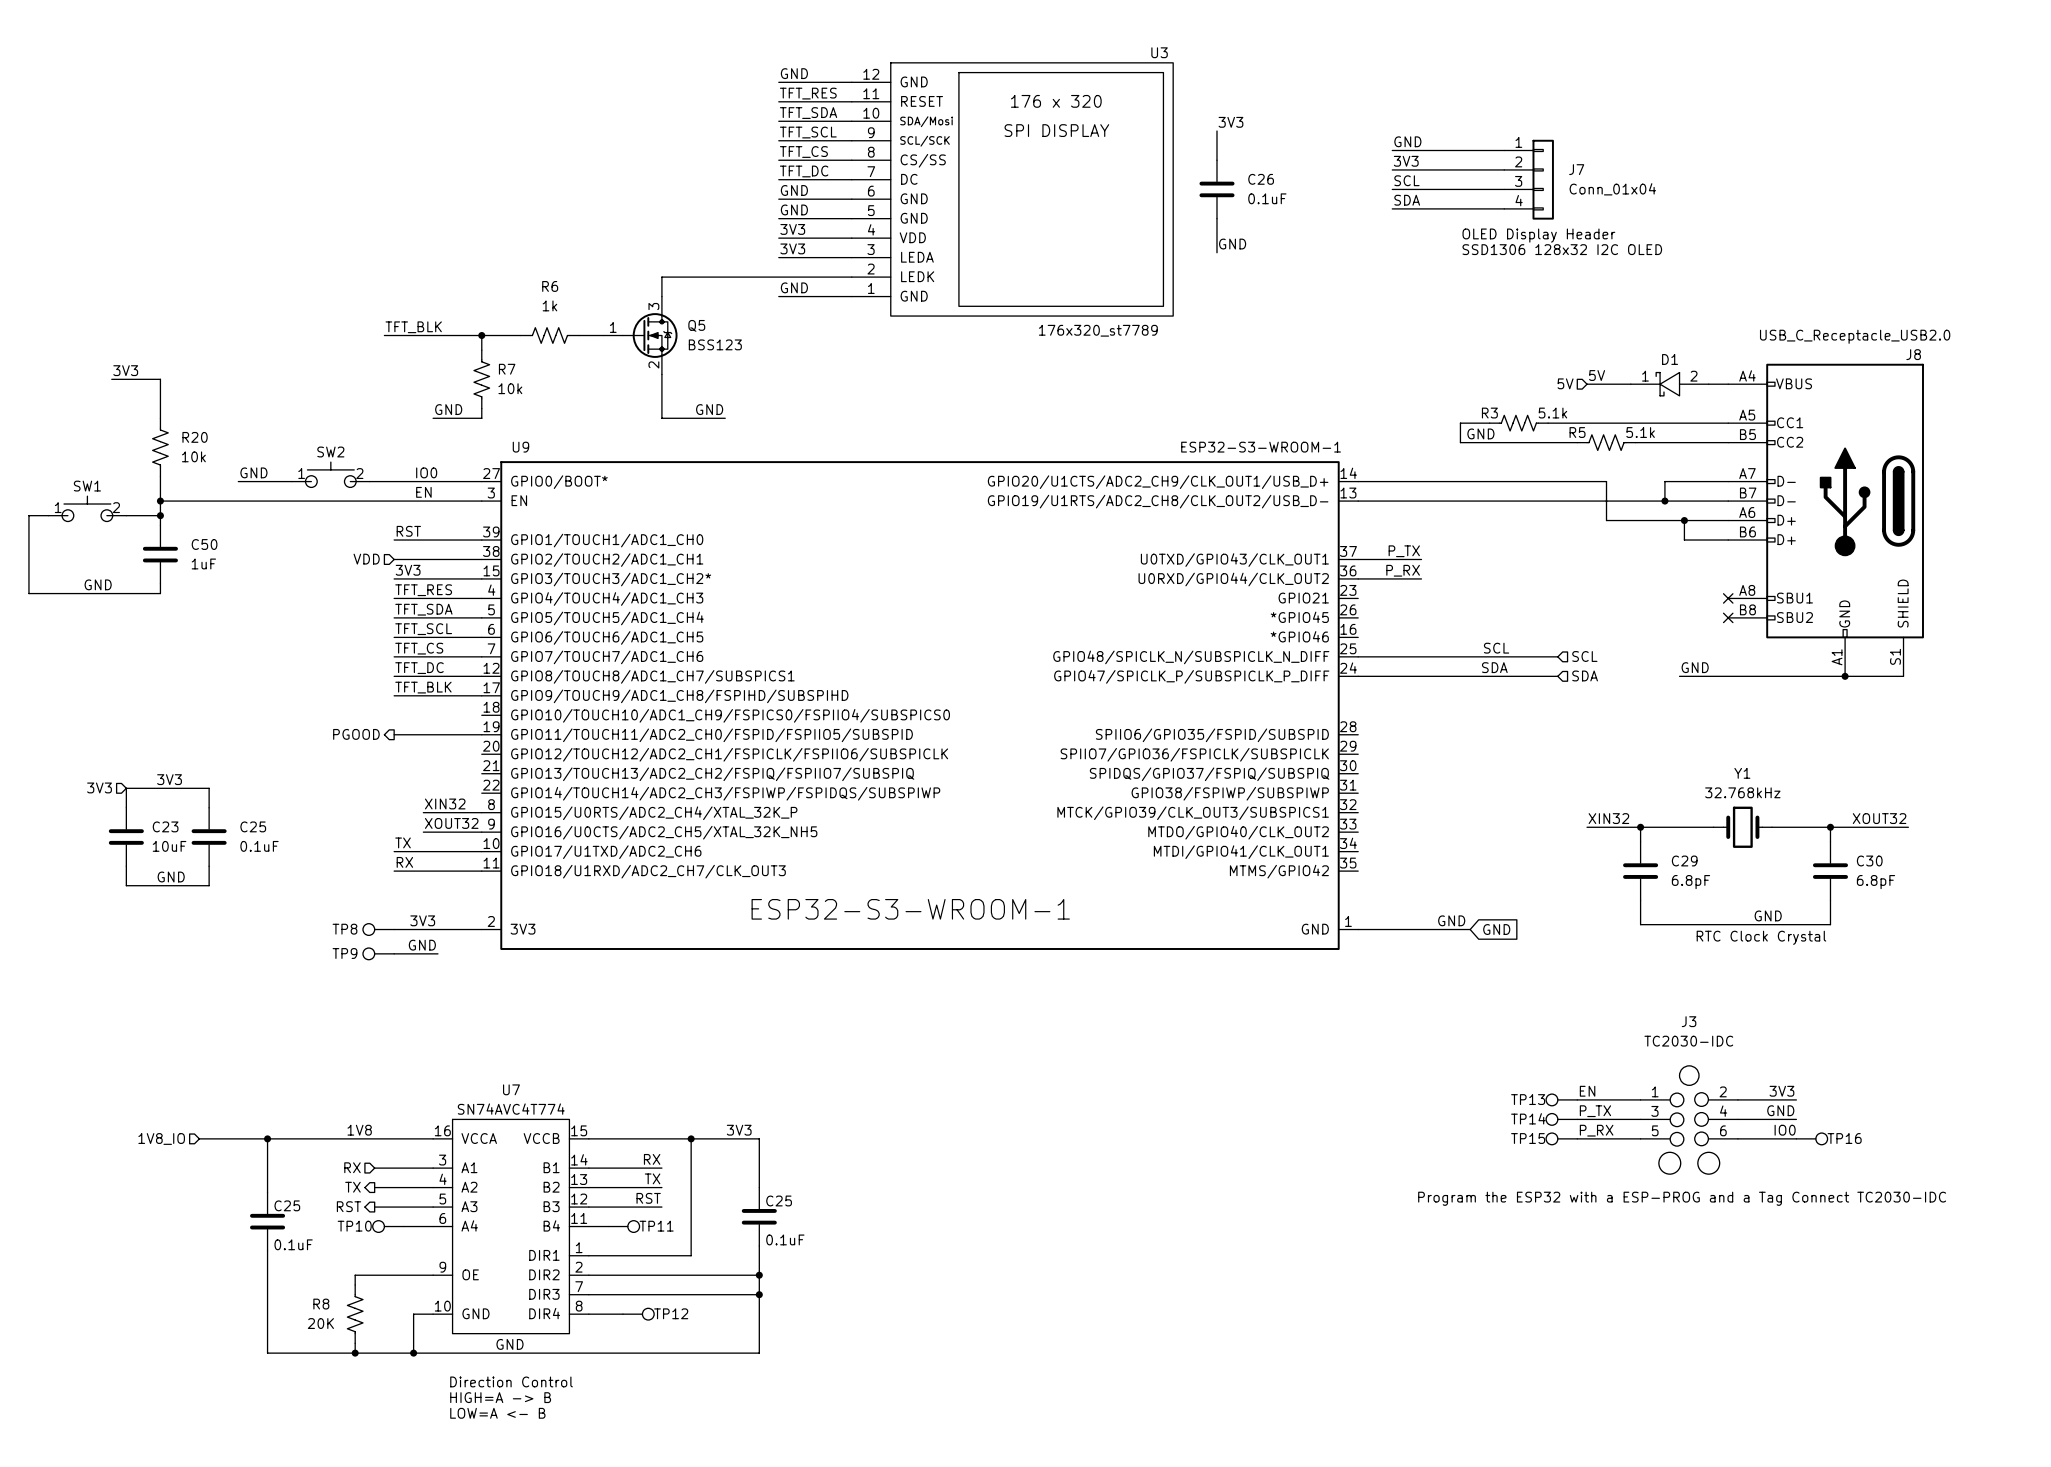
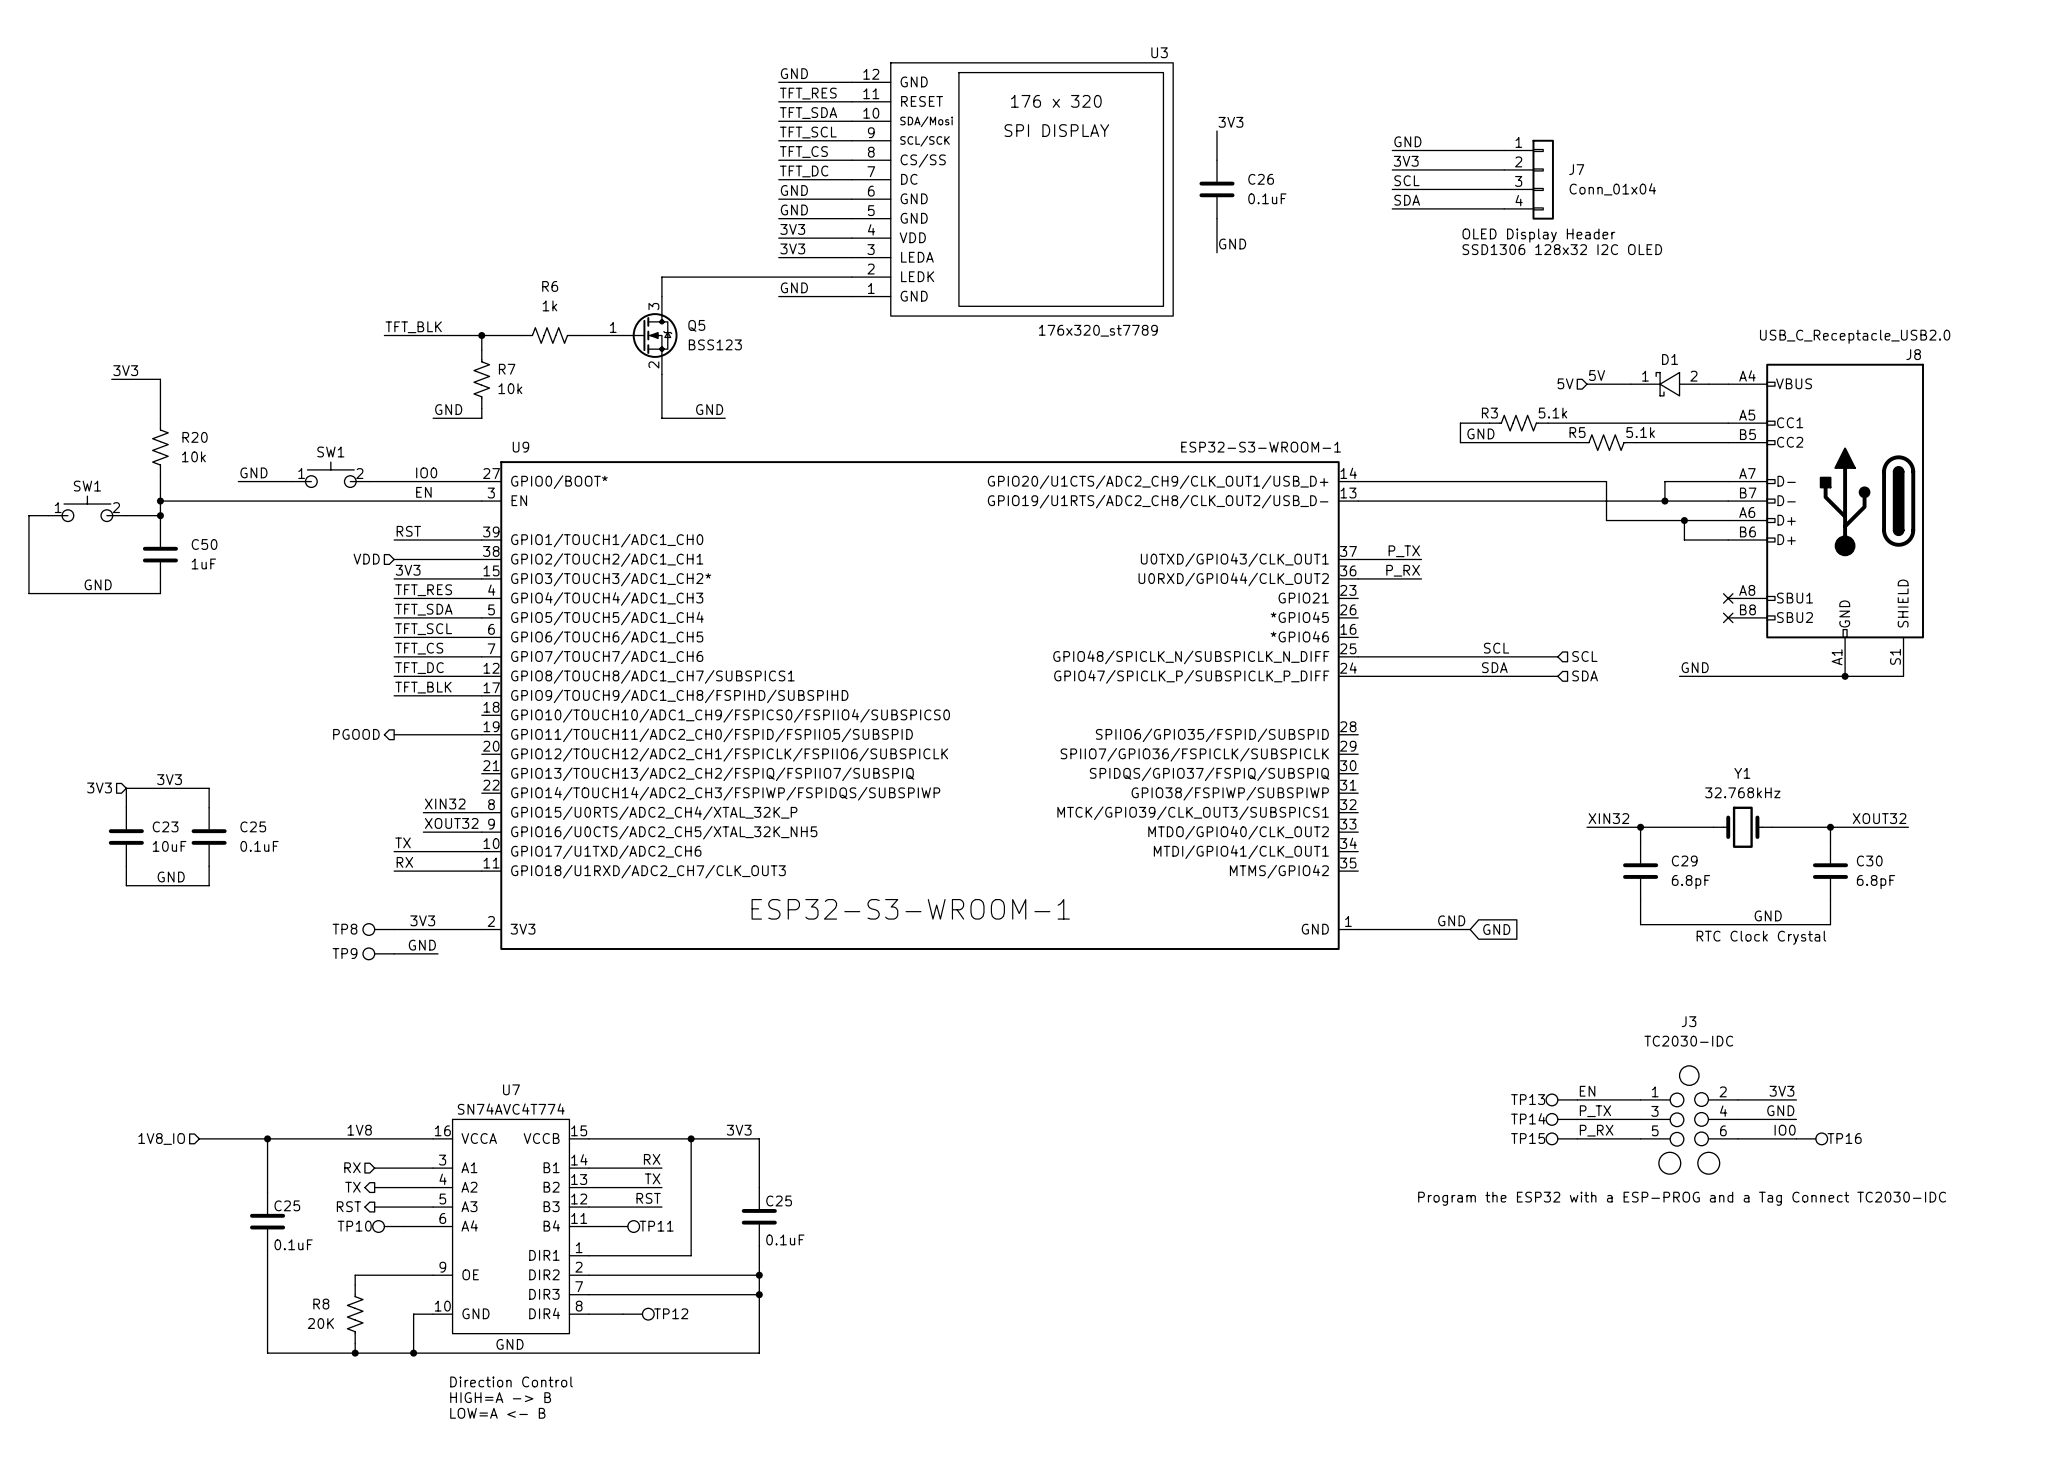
SW2 name: SW2 (330, 452) -> SW1 (330, 452)

